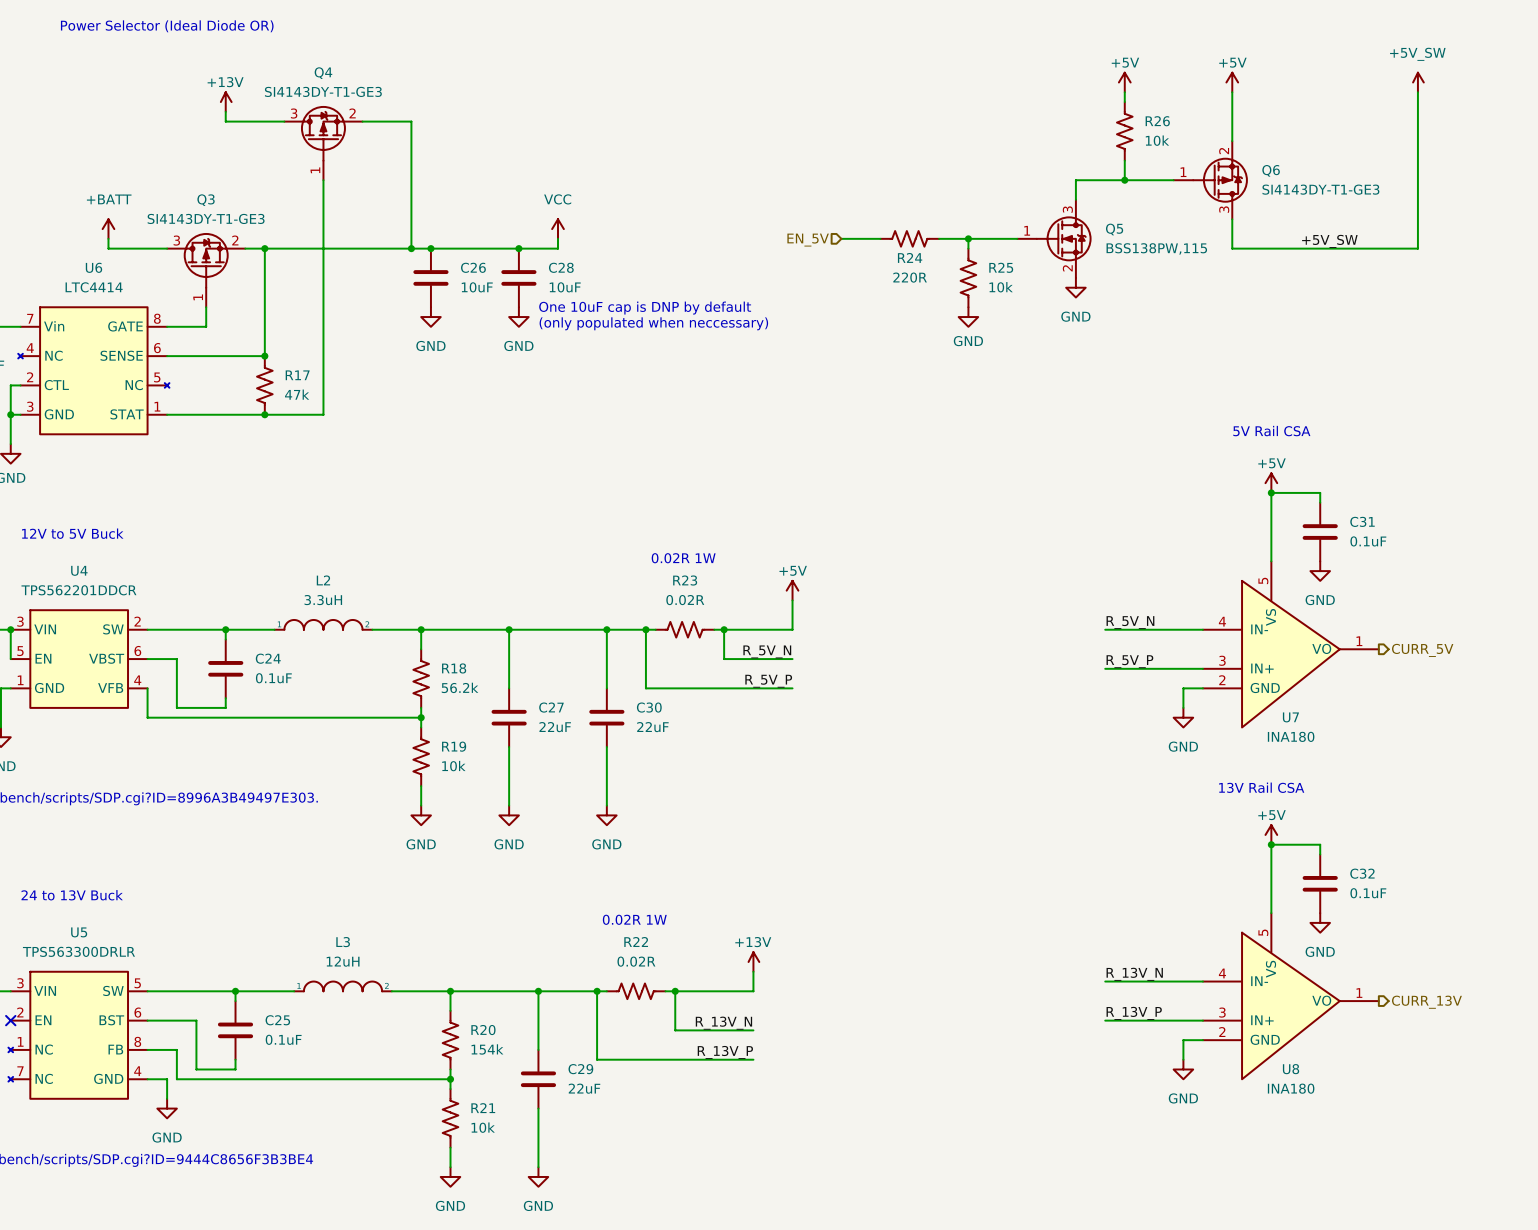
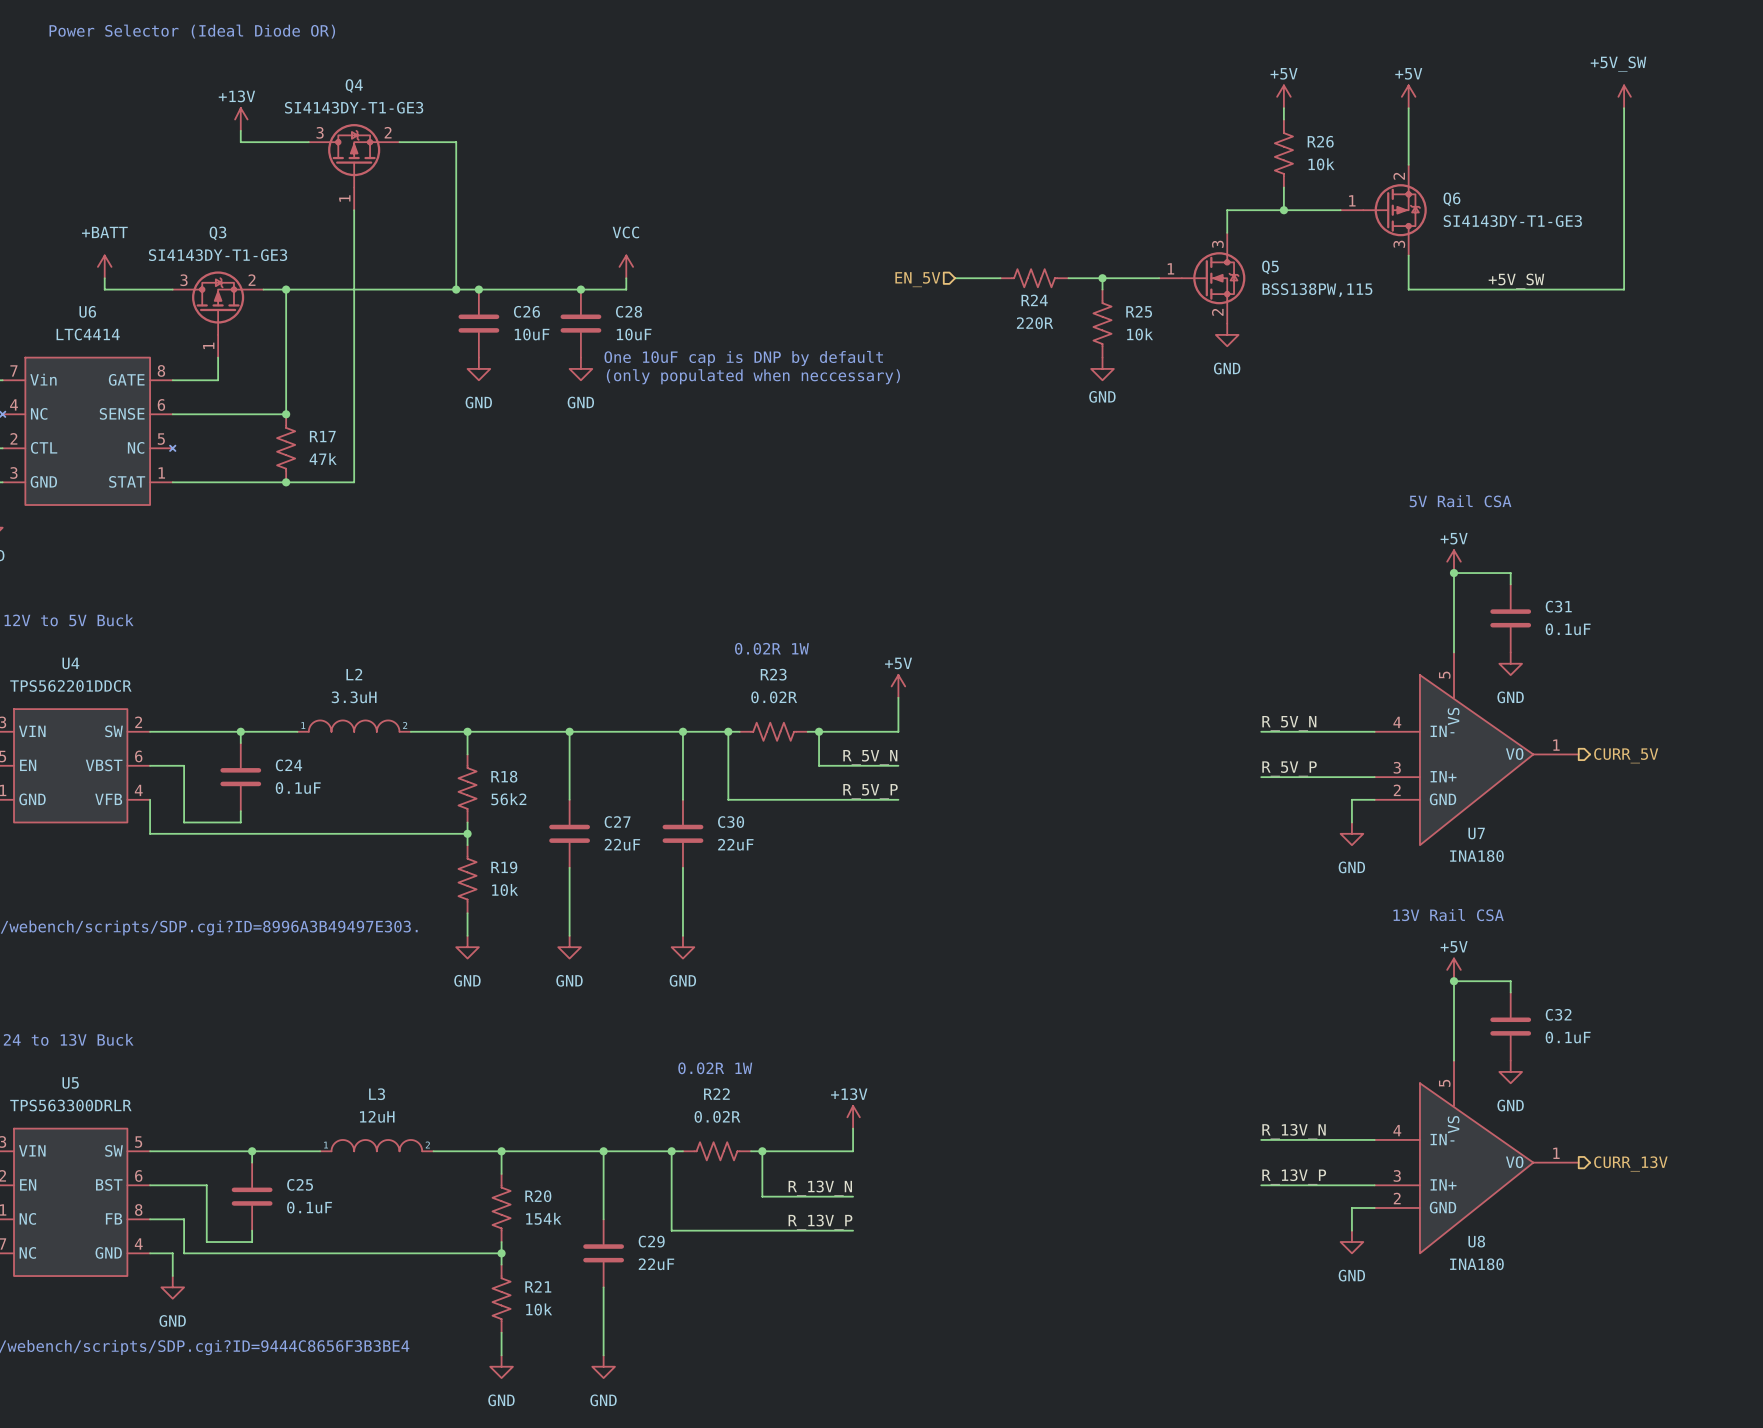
R18 value: 56.2k (460, 687) -> 56k2 (508, 799)

